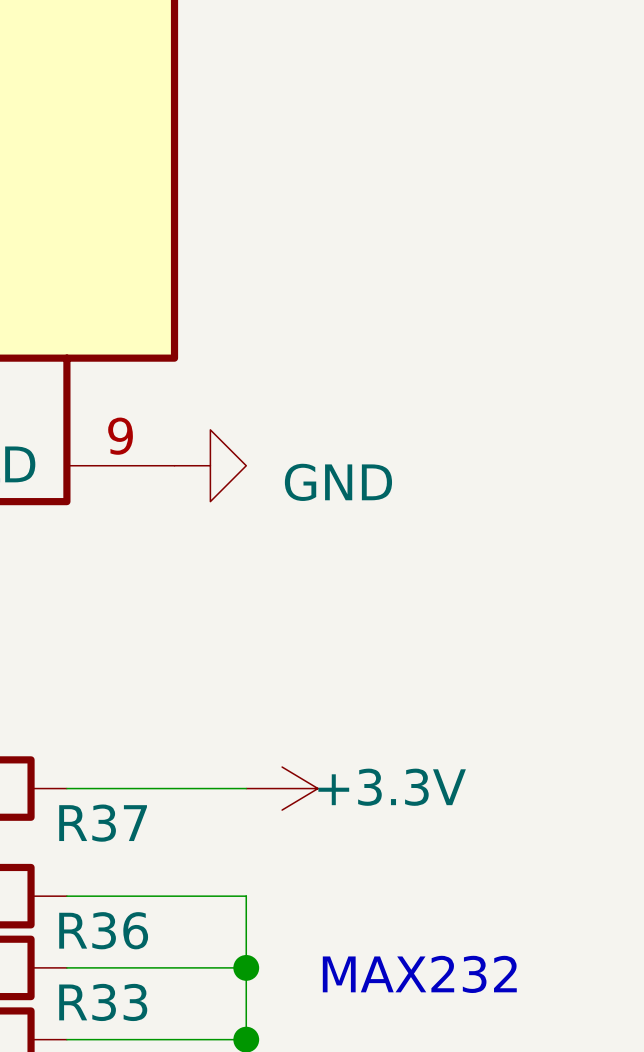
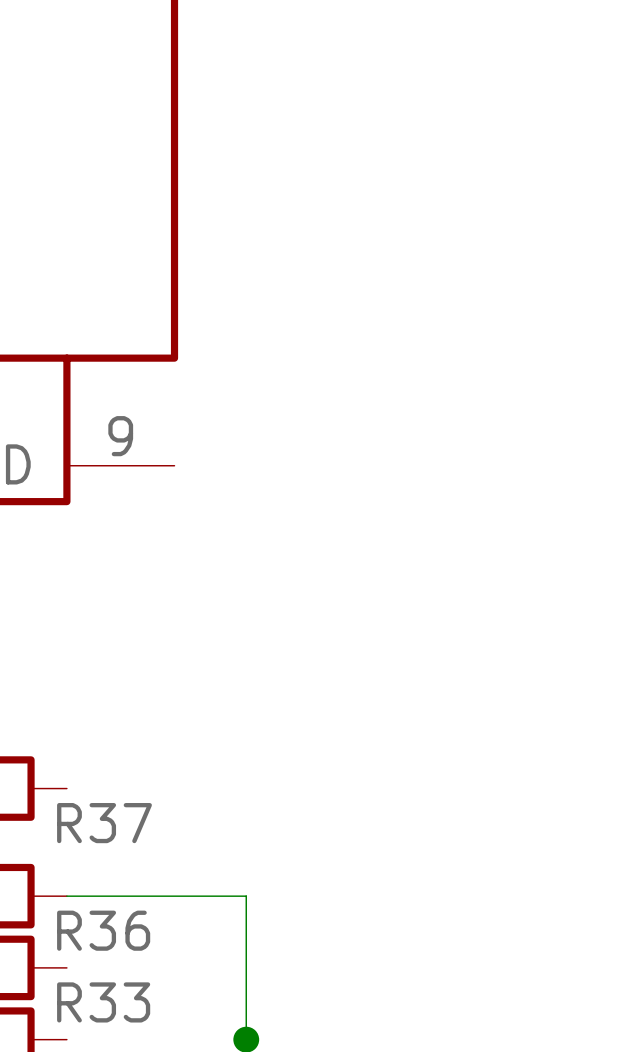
power symbol: GND (210, 465) -> none
wire: (66, 788) (246, 788) -> none
power symbol: +3.3V (282, 788) -> none
wire: (66, 967) (246, 967) -> none
junction: (246, 967) -> none
text: MAX232 (419, 974) -> none
wire: (66, 1039) (246, 1039) -> none

